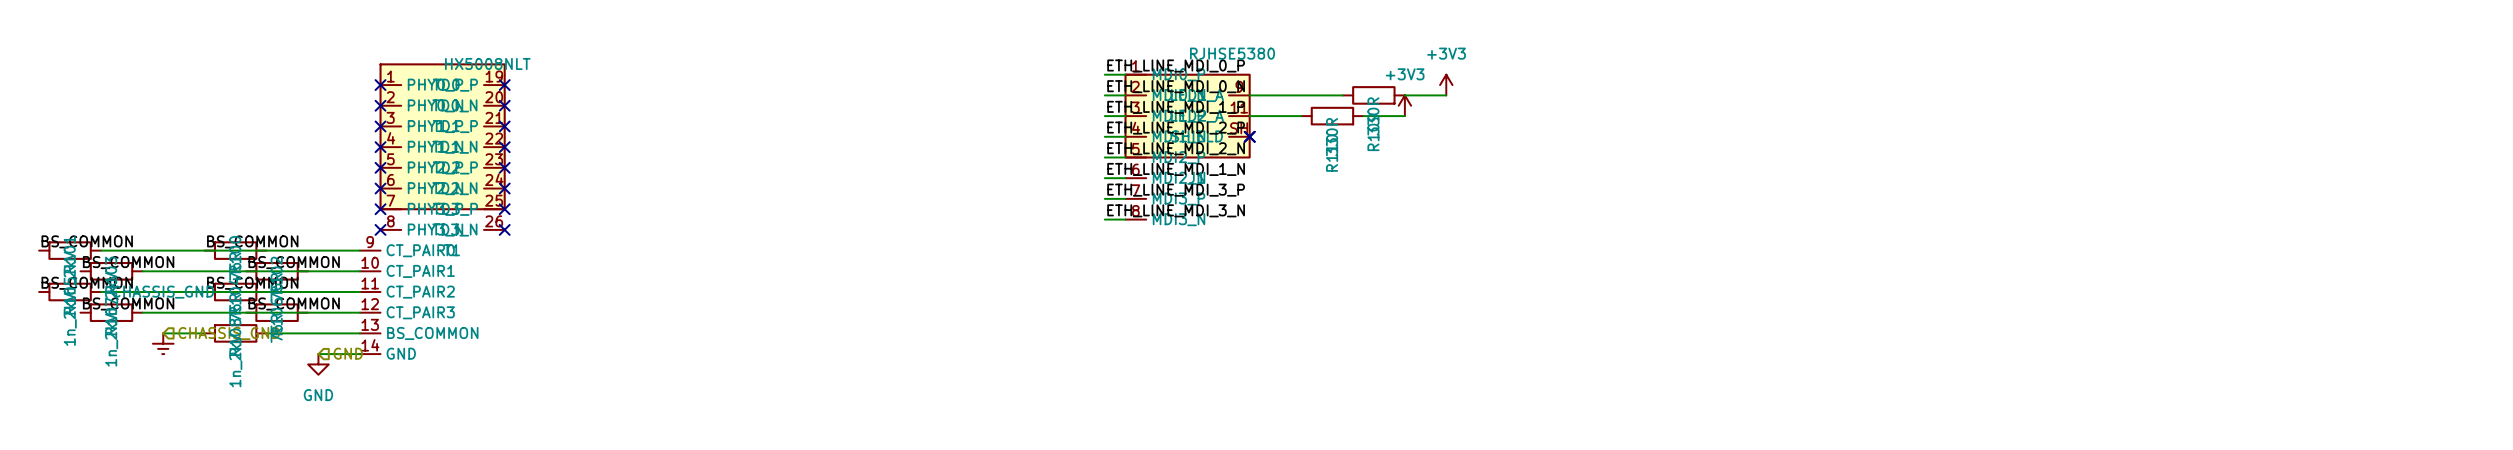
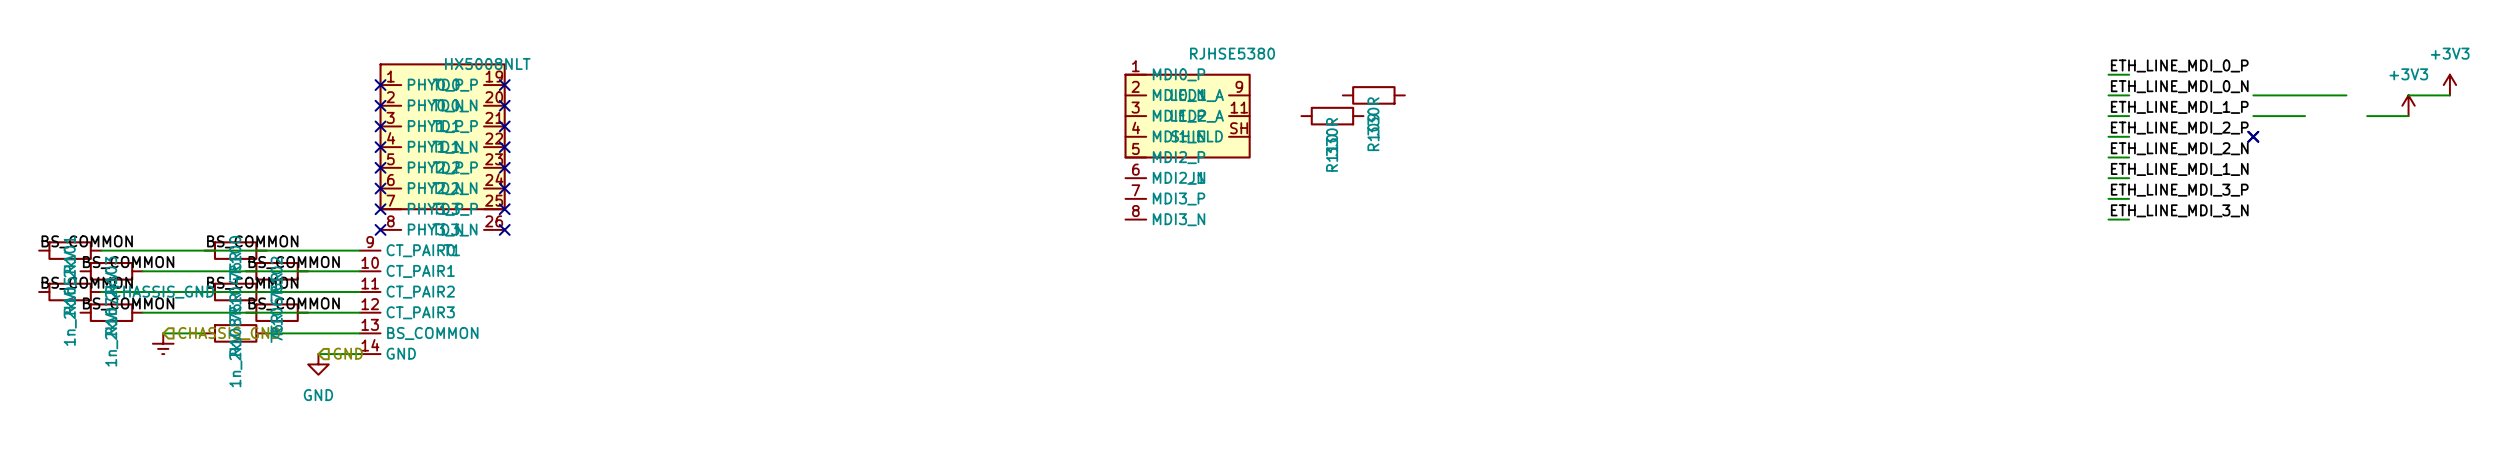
label: ETH_LINE_MDI_0_P (1176, 65) -> none
label: none -> ETH_LINE_MDI_0_P (2179, 65)
wire: (1104, 74) (1125, 74) -> none
wire: none -> (2108, 74) (2129, 74)
power symbol: +3V3 (1446, 85) -> none
power symbol: none -> +3V3 (2449, 85)
label: ETH_LINE_MDI_0_N (1176, 86) -> none
label: none -> ETH_LINE_MDI_0_N (2179, 86)
wire: (1104, 95) (1125, 95) -> none
wire: (1249, 95) (1342, 95) -> none
wire: (1404, 95) (1446, 95) -> none
wire: none -> (2108, 95) (2129, 95)
wire: none -> (2253, 95) (2346, 95)
wire: none -> (2408, 95) (2449, 95)
power symbol: +3V3 (1404, 105) -> none
power symbol: none -> +3V3 (2408, 105)
label: ETH_LINE_MDI_1_P (1176, 107) -> none
label: none -> ETH_LINE_MDI_1_P (2179, 107)
wire: (1104, 116) (1125, 116) -> none
wire: (1249, 116) (1301, 116) -> none
wire: (1363, 116) (1404, 116) -> none
wire: none -> (2108, 116) (2129, 116)
wire: none -> (2253, 116) (2305, 116)
wire: none -> (2367, 116) (2408, 116)
label: ETH_LINE_MDI_2_P (1176, 128) -> none
label: none -> ETH_LINE_MDI_2_P (2179, 128)
wire: (1104, 136) (1125, 136) -> none
no-connect mark: (1249, 136) -> none
wire: none -> (2108, 136) (2129, 136)
no-connect mark: none -> (2253, 136)
label: ETH_LINE_MDI_2_N (1176, 148) -> none
label: none -> ETH_LINE_MDI_2_N (2179, 148)
wire: (1104, 157) (1125, 157) -> none
wire: none -> (2108, 157) (2129, 157)
label: ETH_LINE_MDI_1_N (1176, 169) -> none
label: none -> ETH_LINE_MDI_1_N (2179, 169)
wire: (1104, 178) (1125, 178) -> none
wire: none -> (2108, 178) (2129, 178)
label: ETH_LINE_MDI_3_P (1176, 190) -> none
label: none -> ETH_LINE_MDI_3_P (2179, 190)
wire: (1104, 198) (1125, 198) -> none
wire: none -> (2108, 198) (2129, 198)
label: ETH_LINE_MDI_3_N (1176, 210) -> none
label: none -> ETH_LINE_MDI_3_N (2179, 210)
wire: (1104, 219) (1125, 219) -> none
wire: none -> (2108, 219) (2129, 219)

